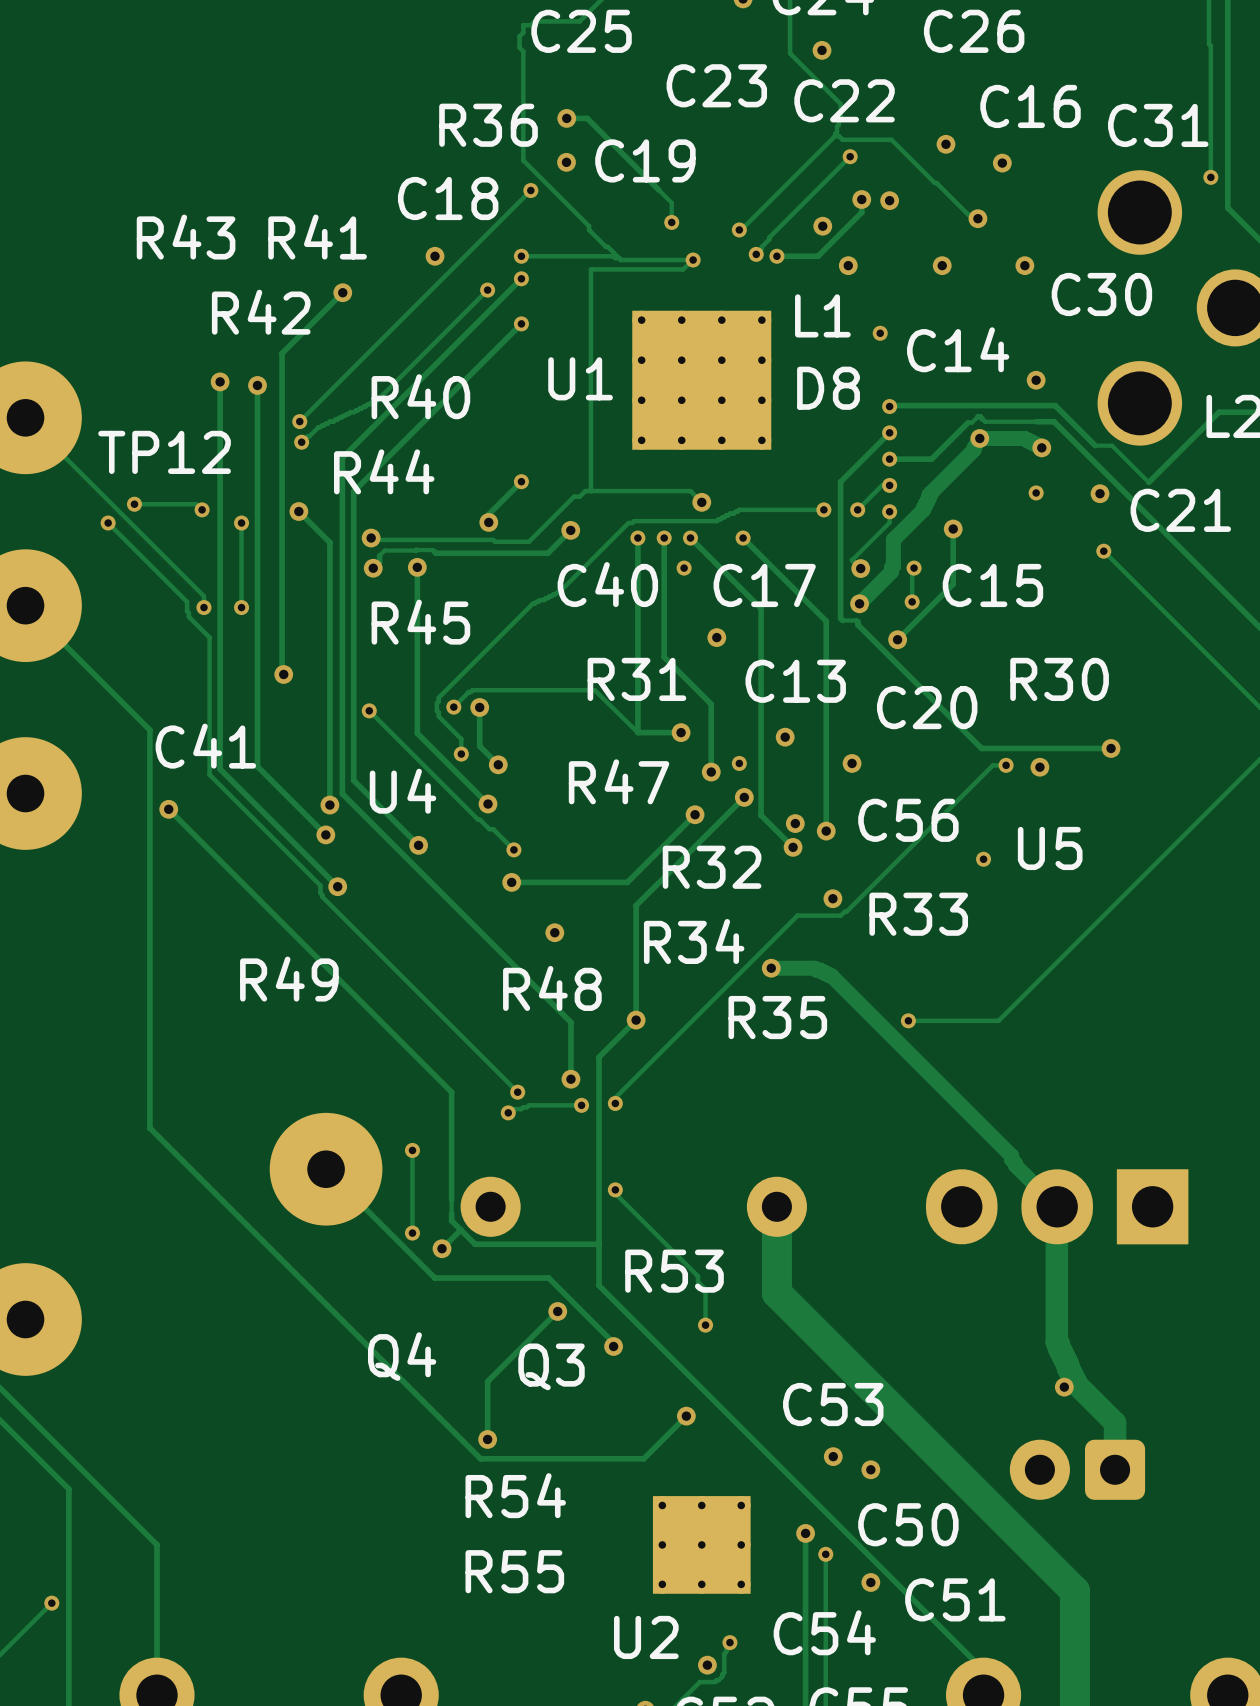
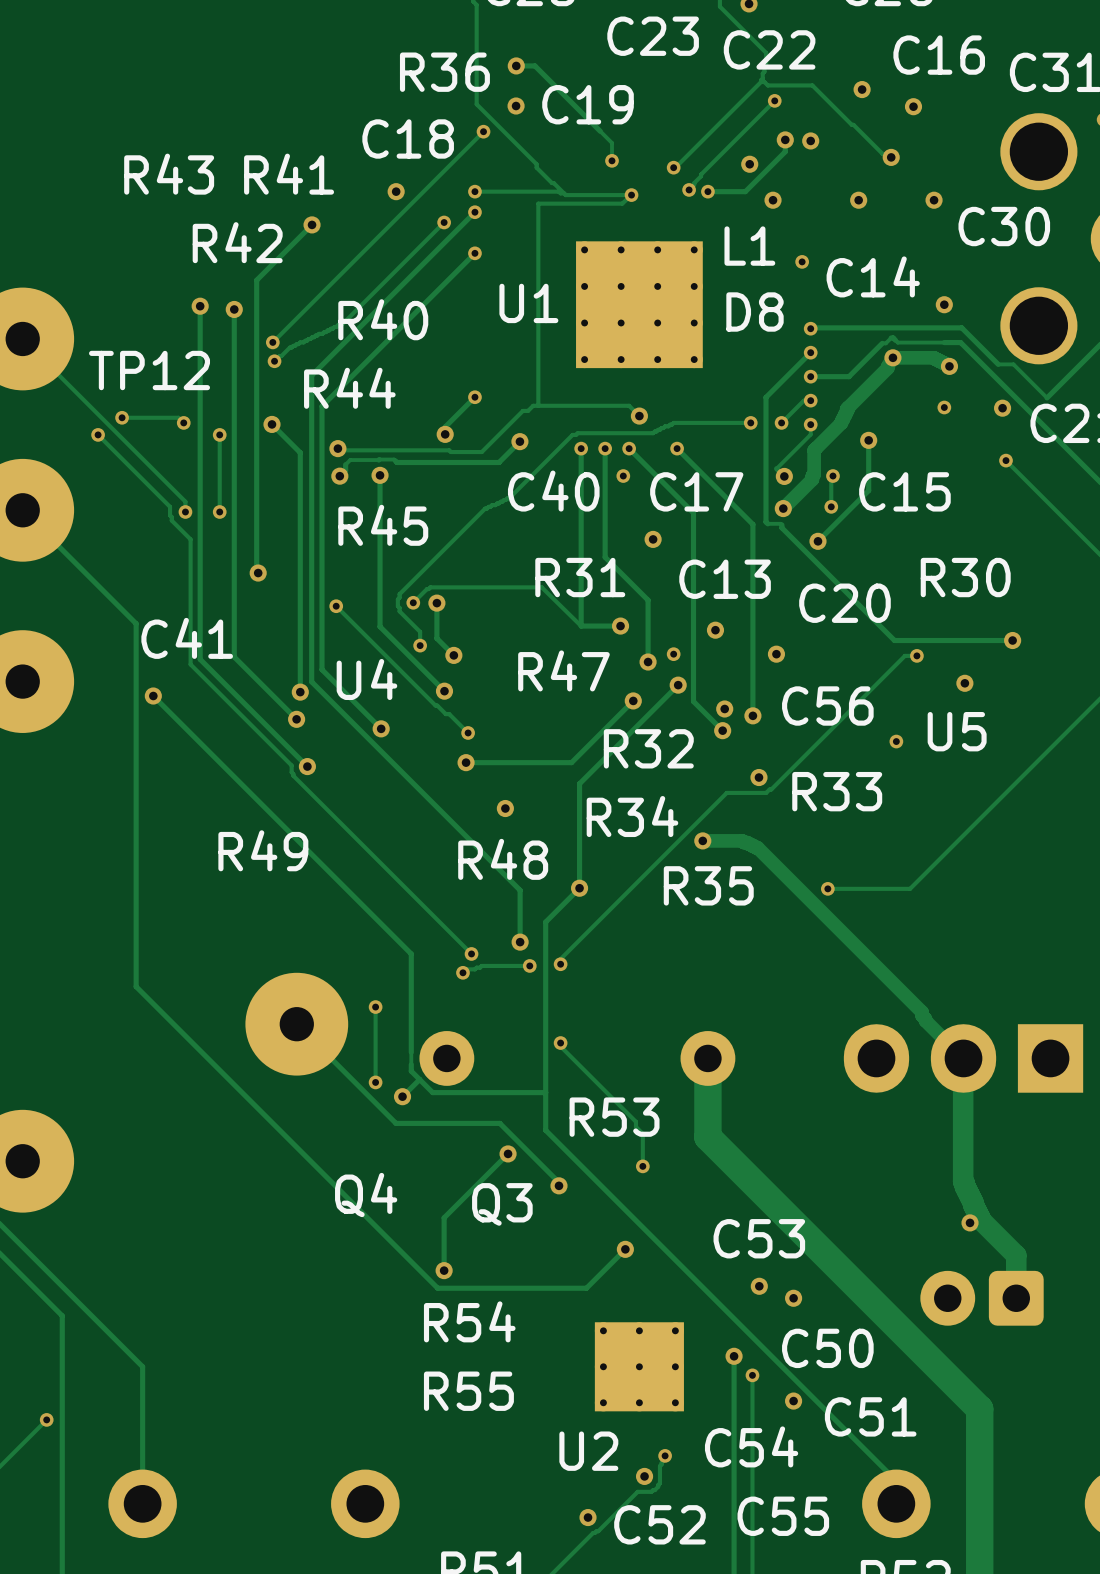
via position: (1039, 767) -> (964, 683)

